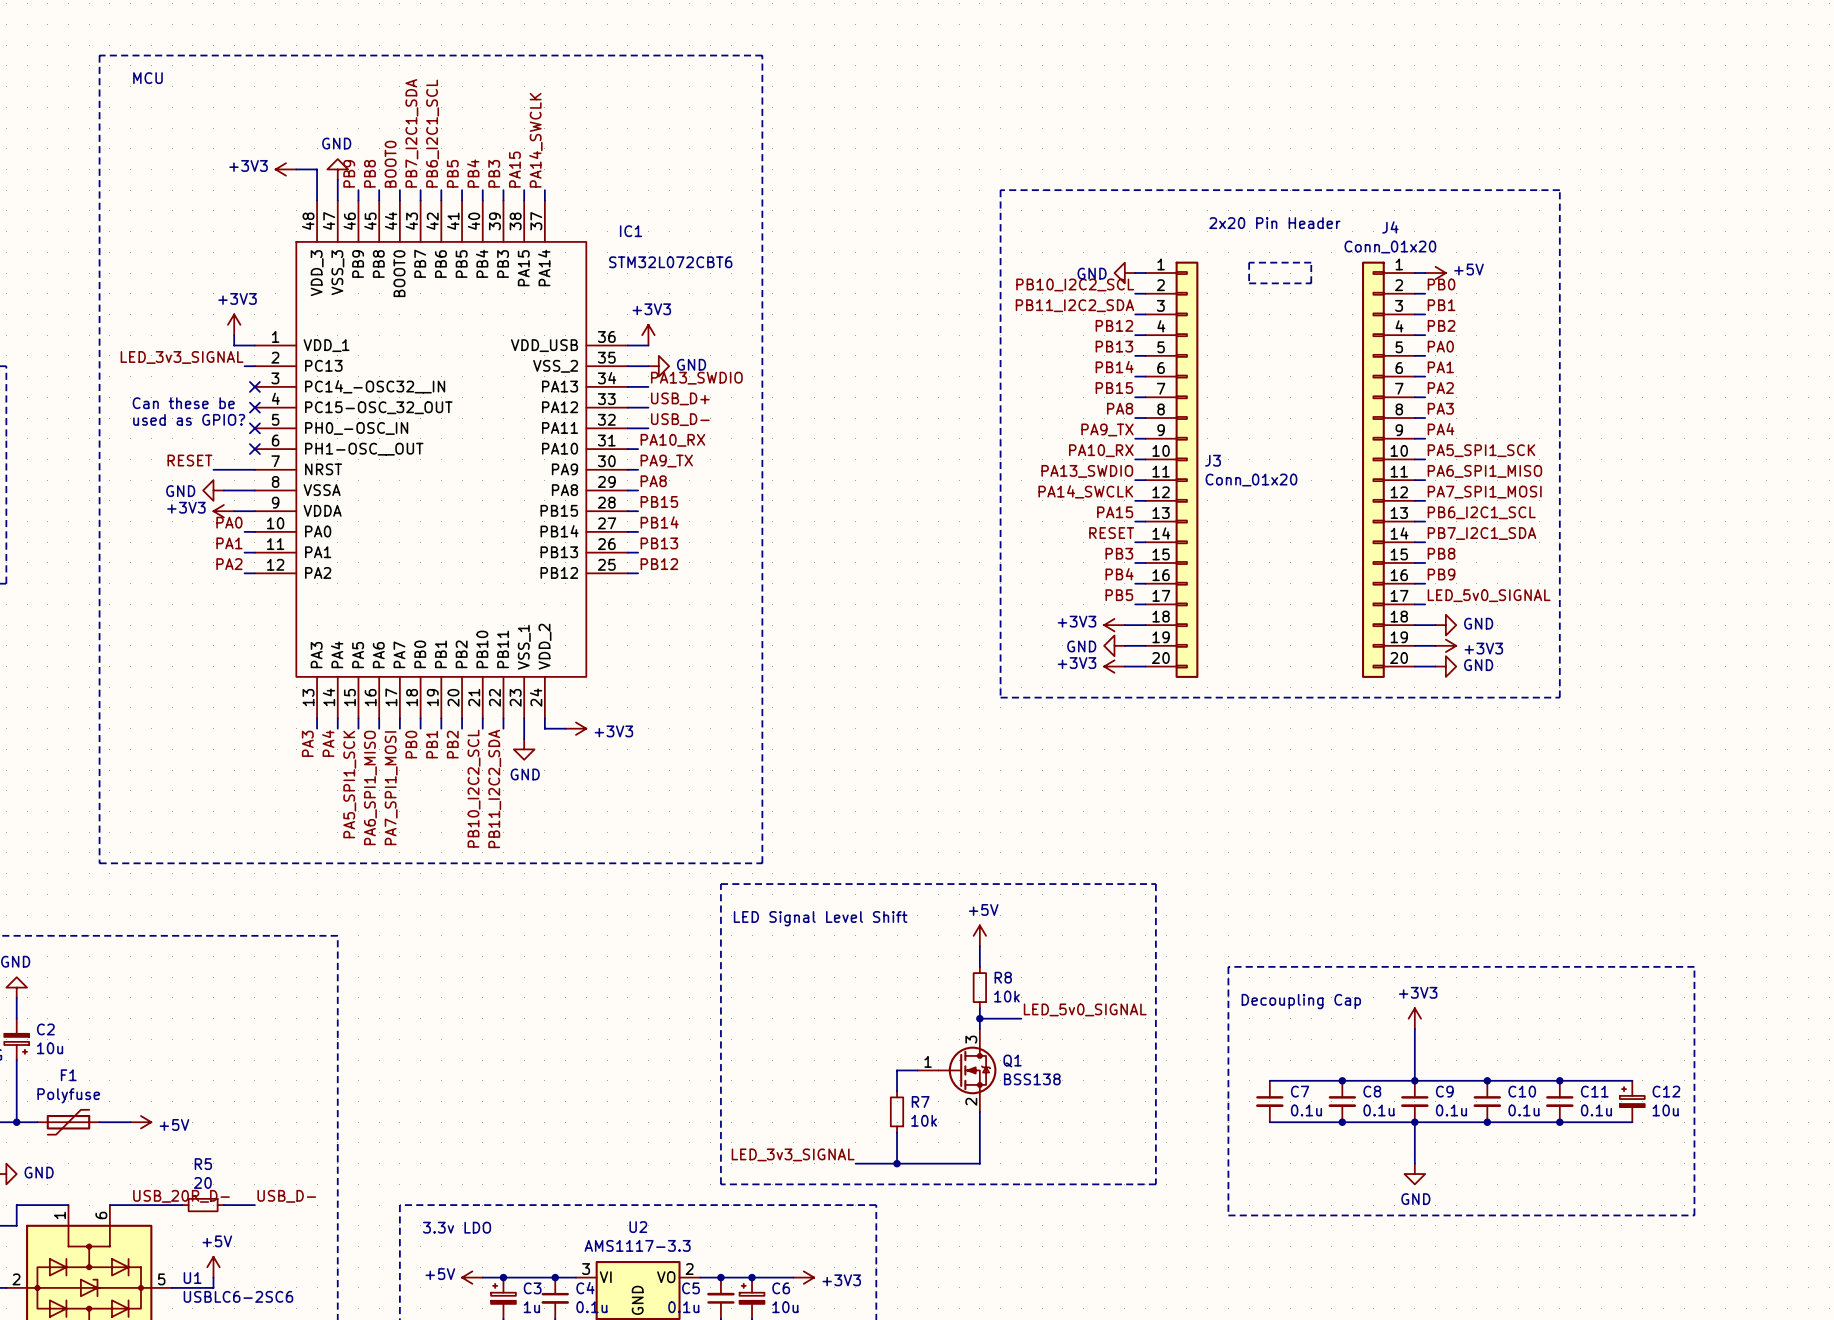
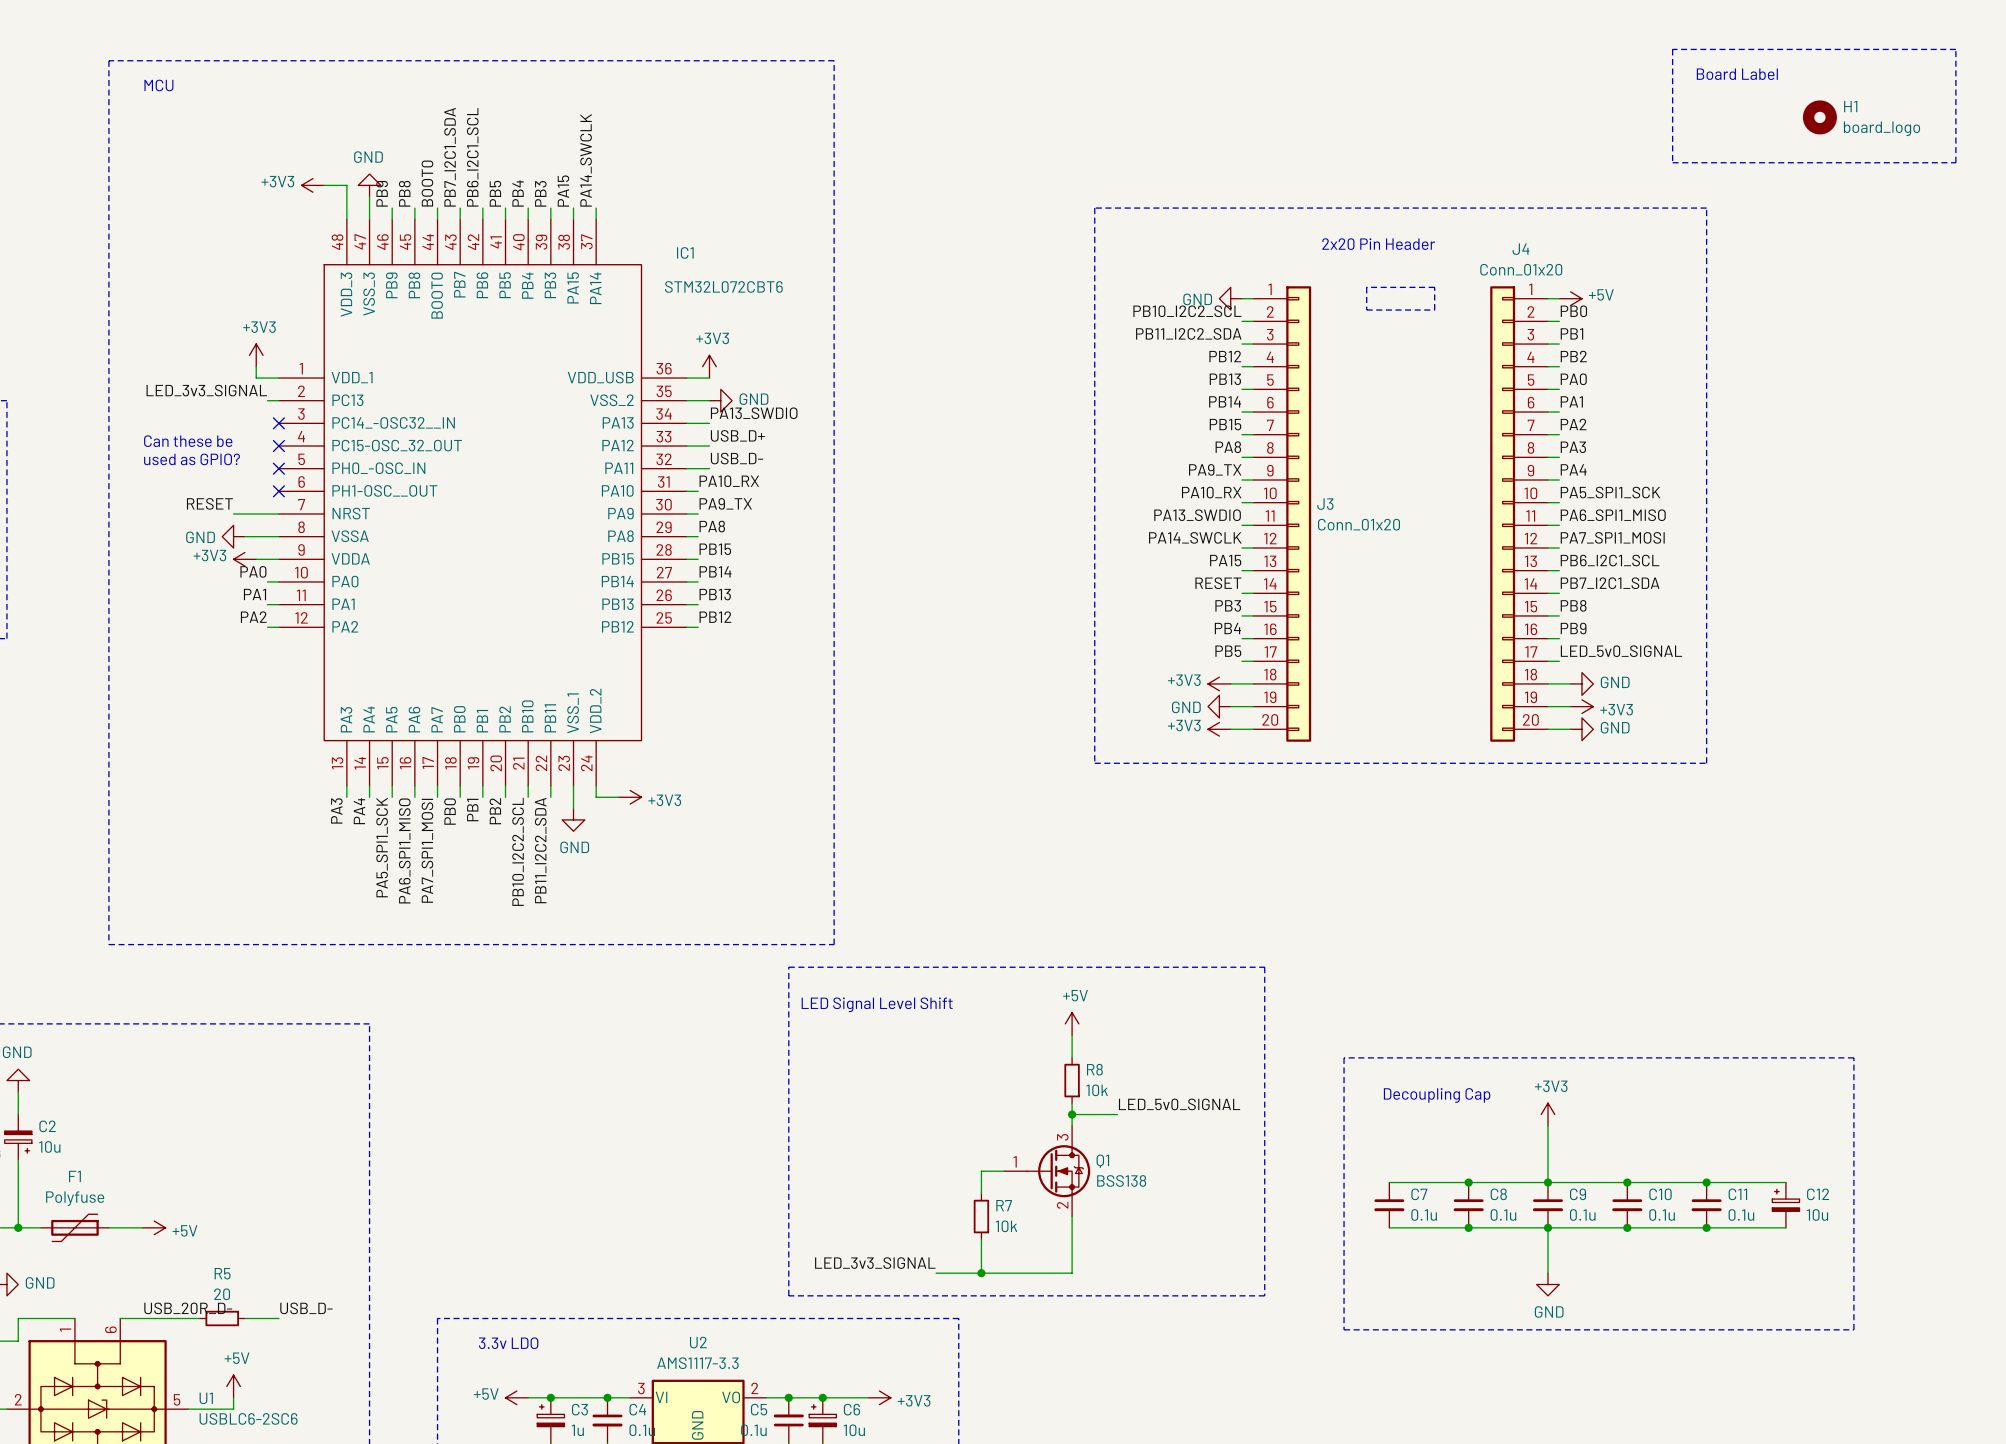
line: none -> (1672, 49) (1672, 162) (1955, 162) (1955, 49) (1672, 49)
text: none -> Board Label (1737, 74)
H1: none -> board_logo (1819, 117)

